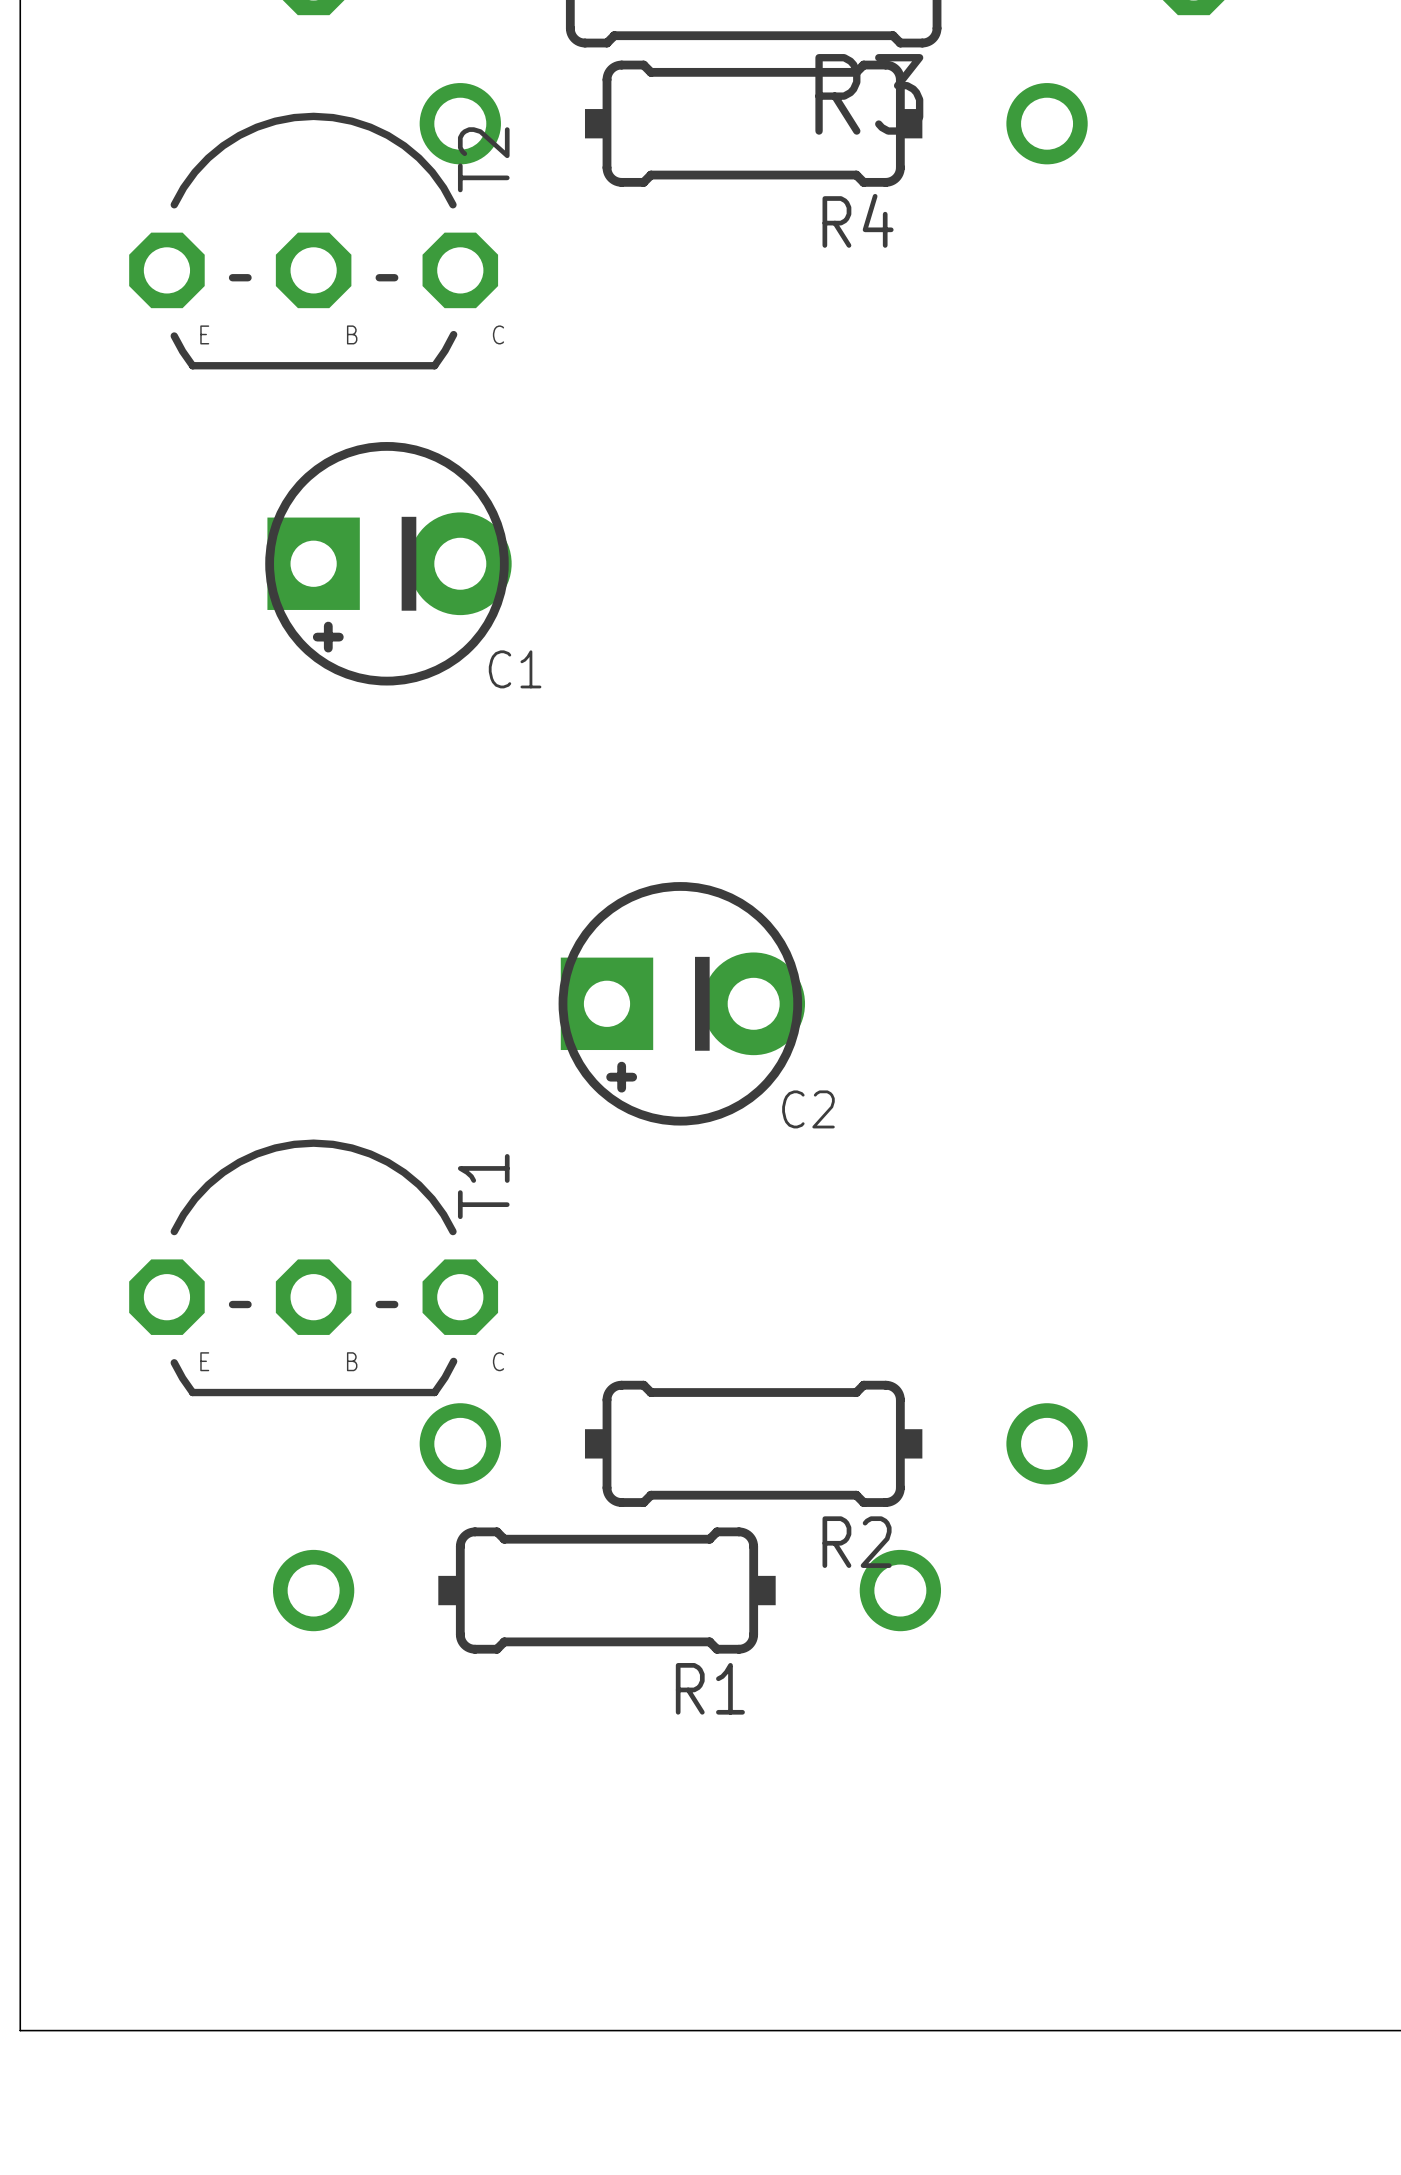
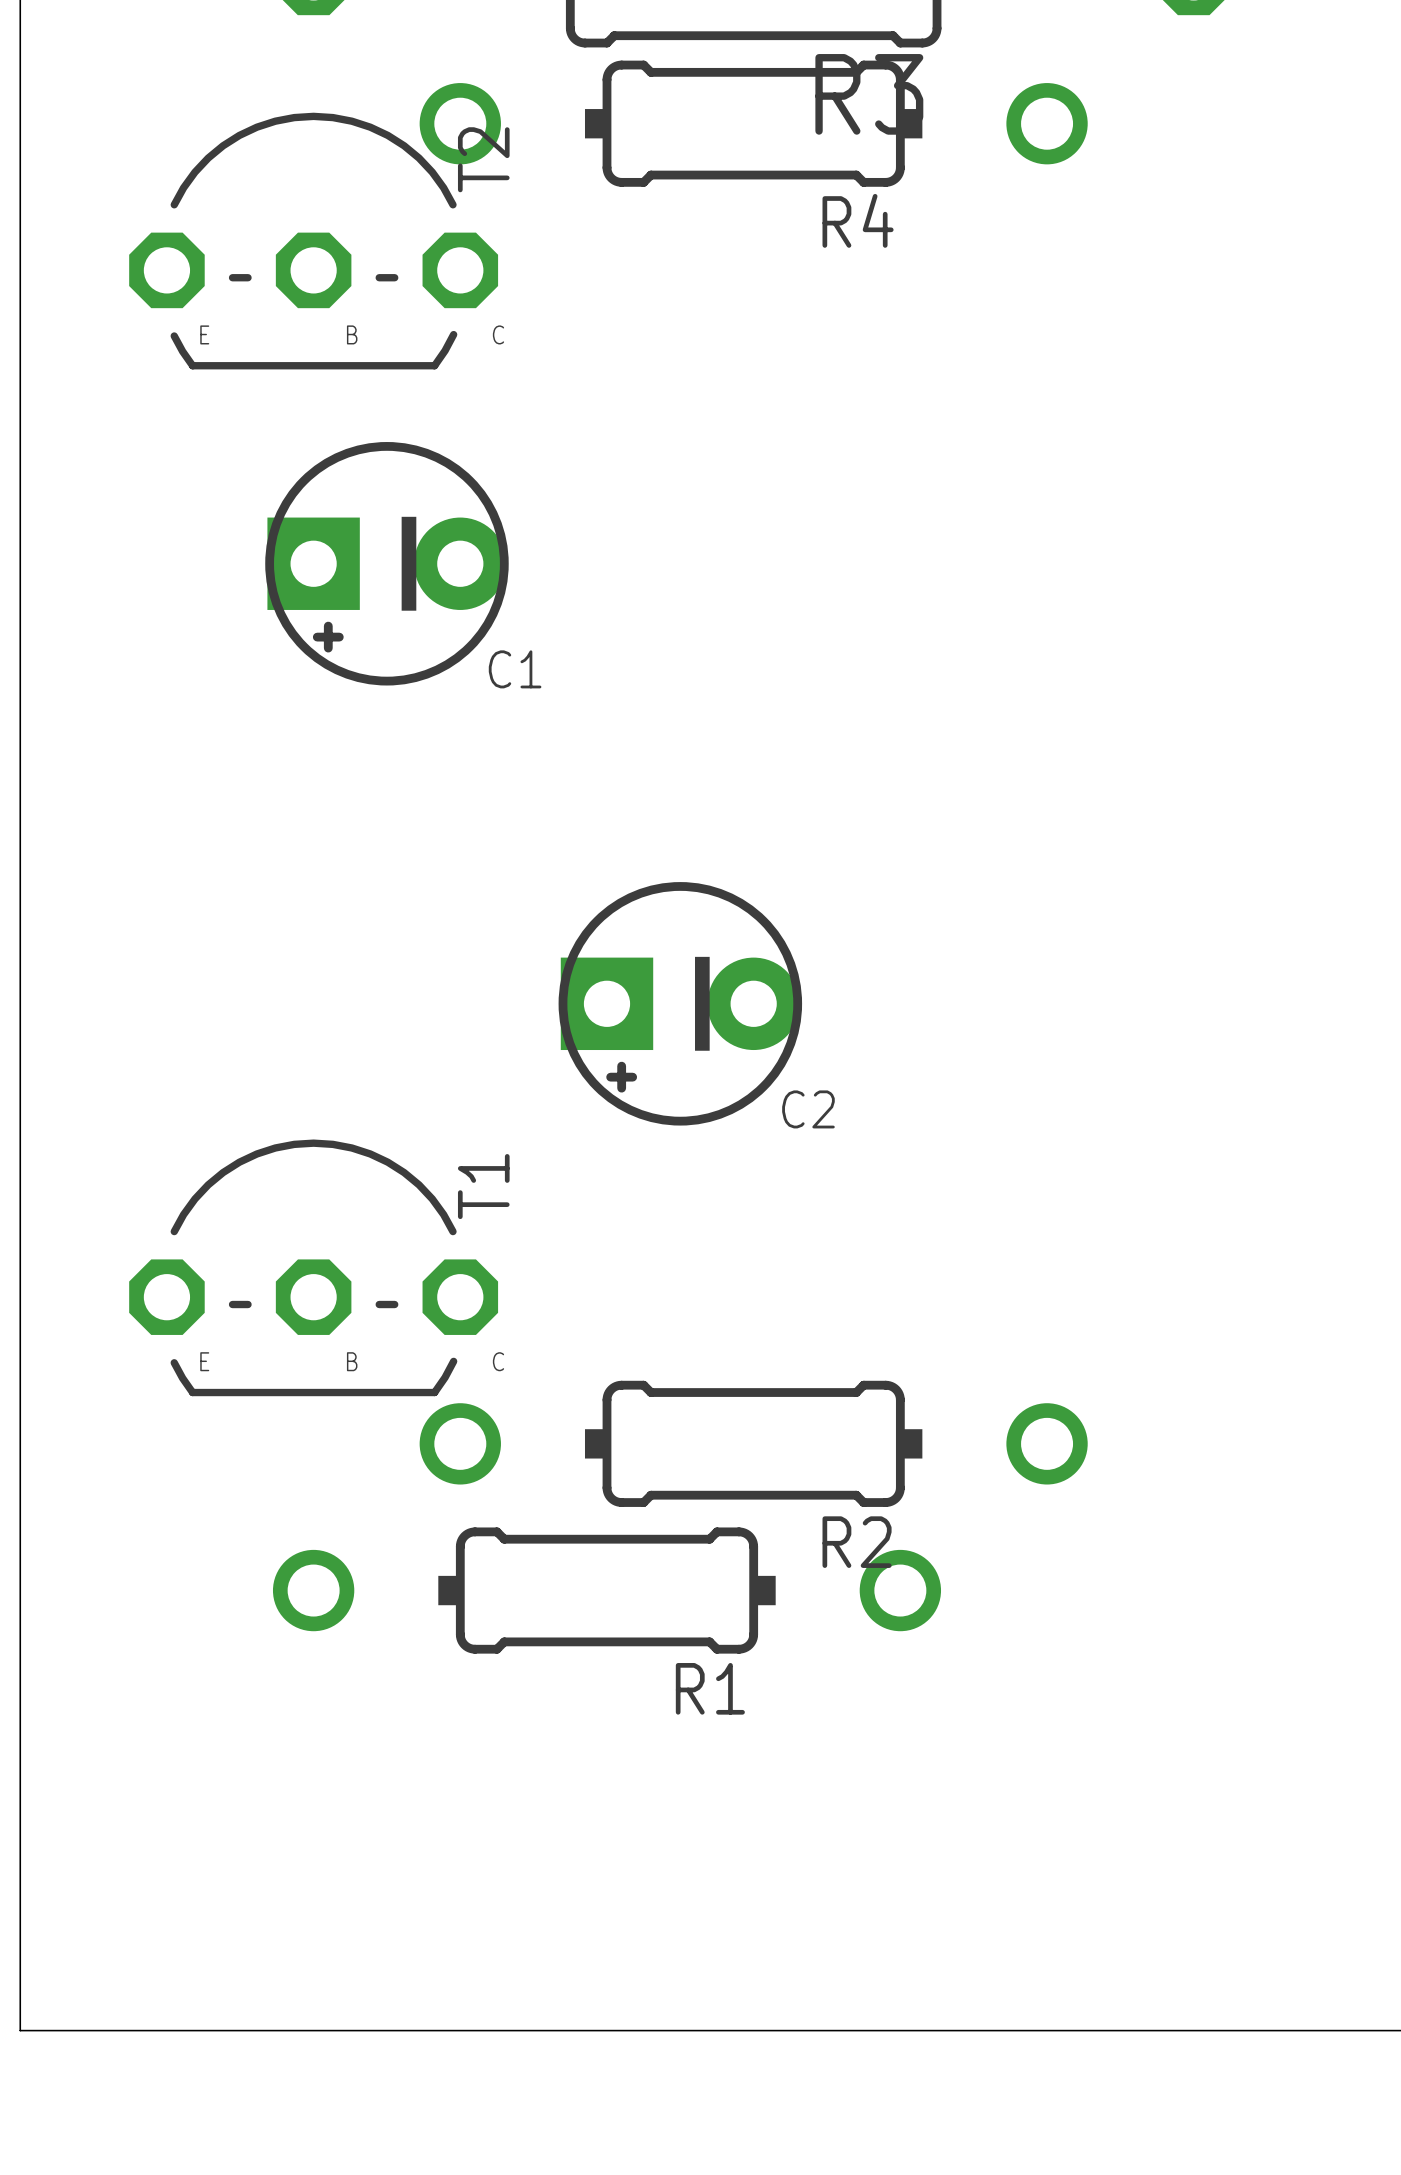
C1 footprint: [265, 442, 512, 686] -> [265, 442, 509, 686]
C2 footprint: [558, 882, 806, 1126] -> [558, 882, 803, 1126]

